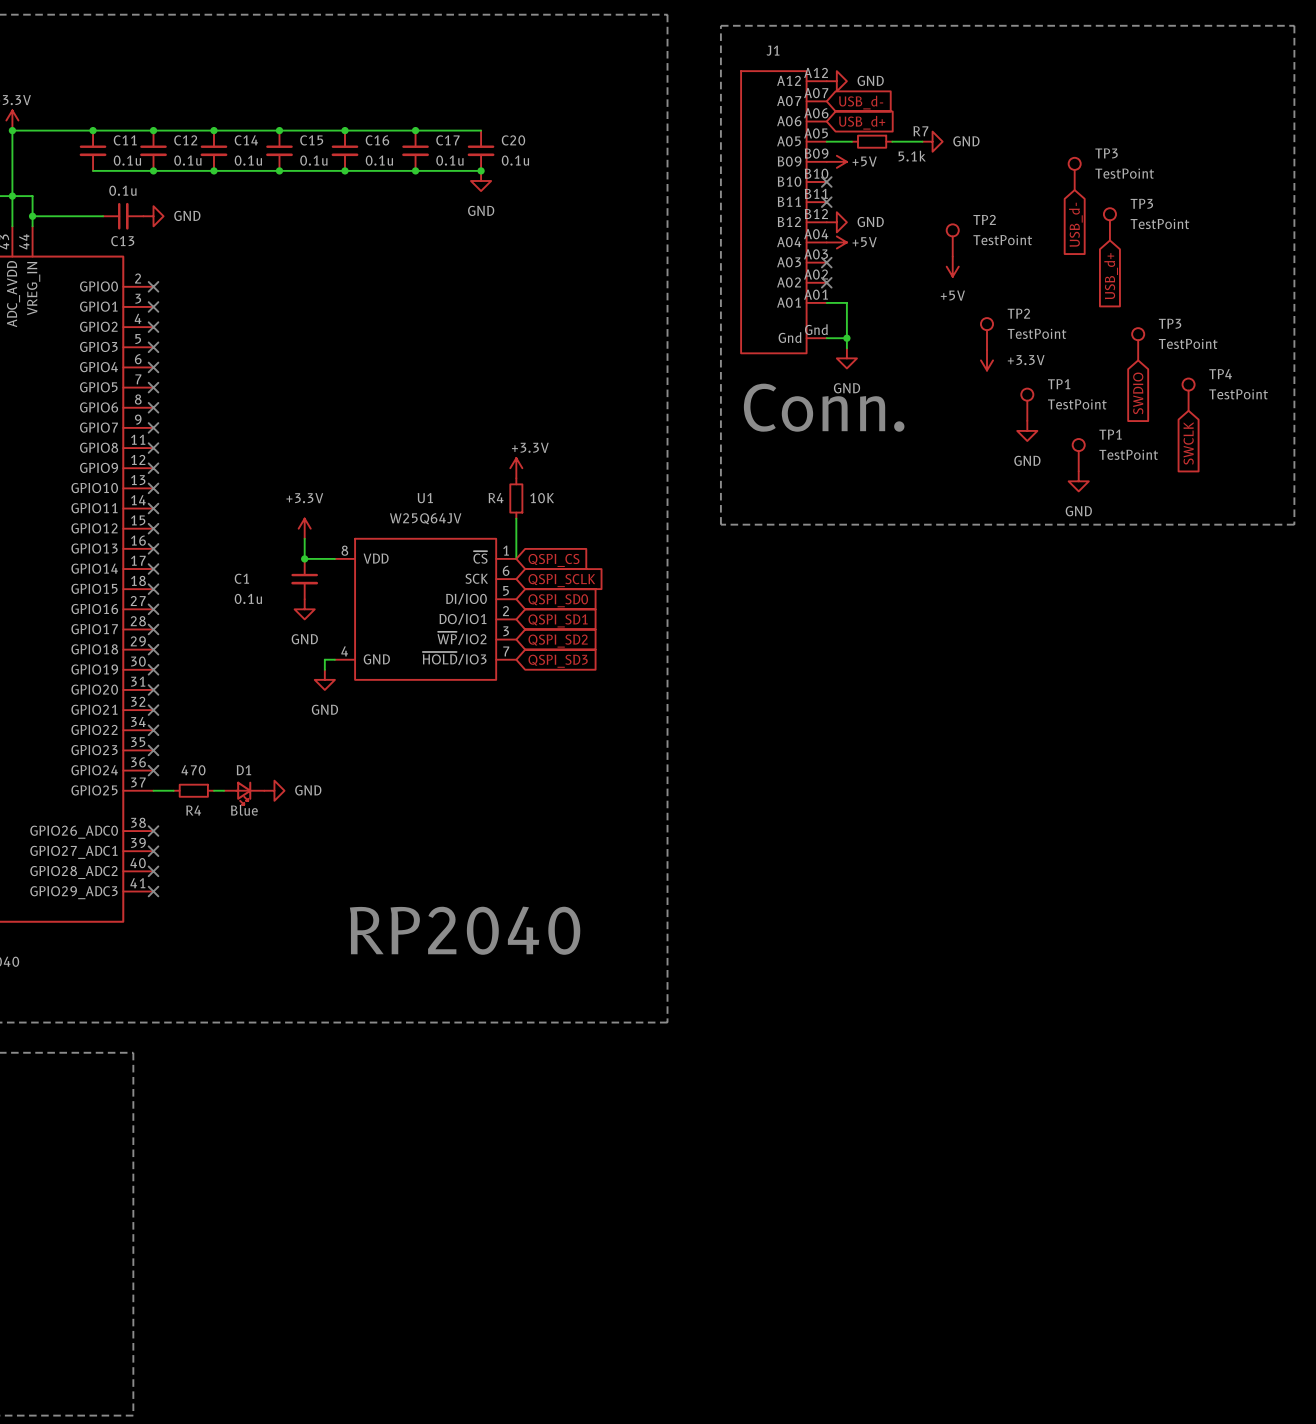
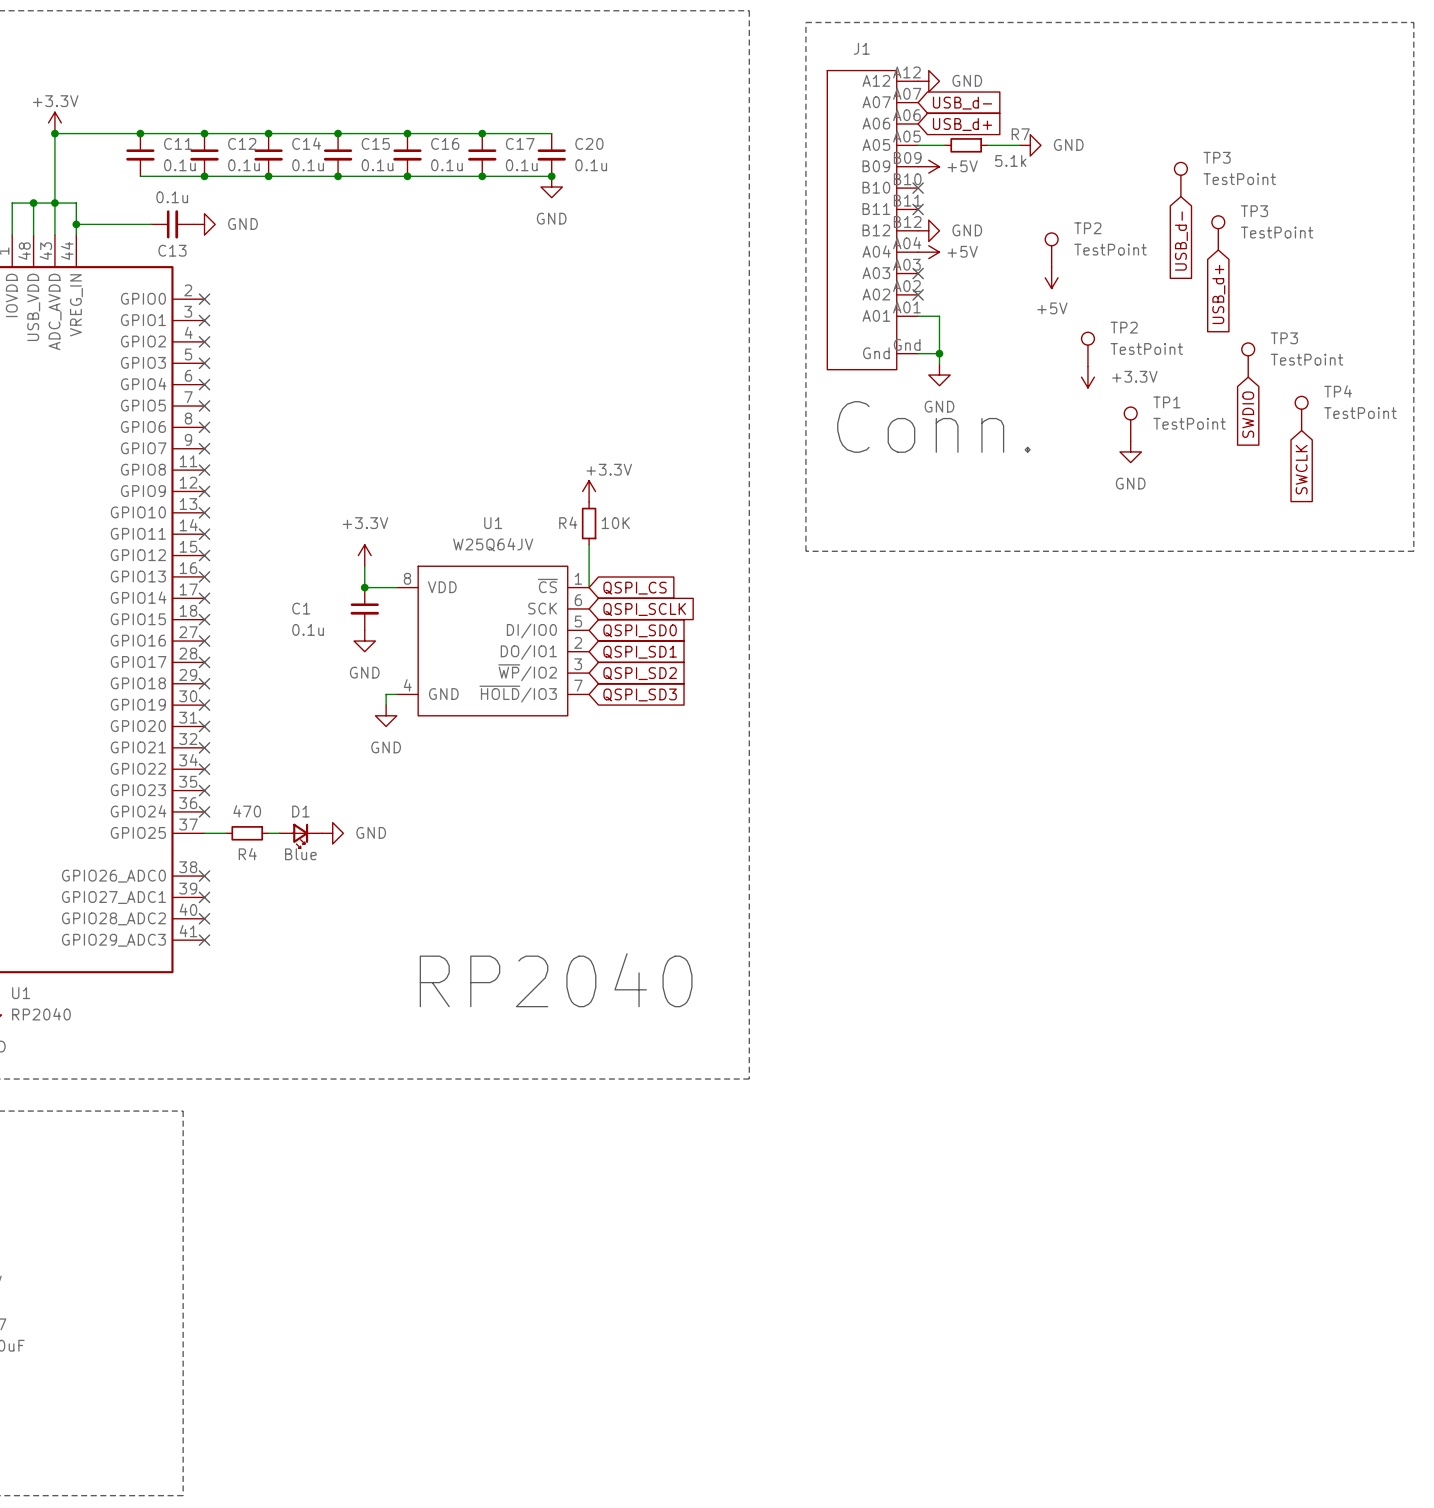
TP1: TestPoint (1078, 455) -> none
power symbol: GND (1078, 481) -> none

